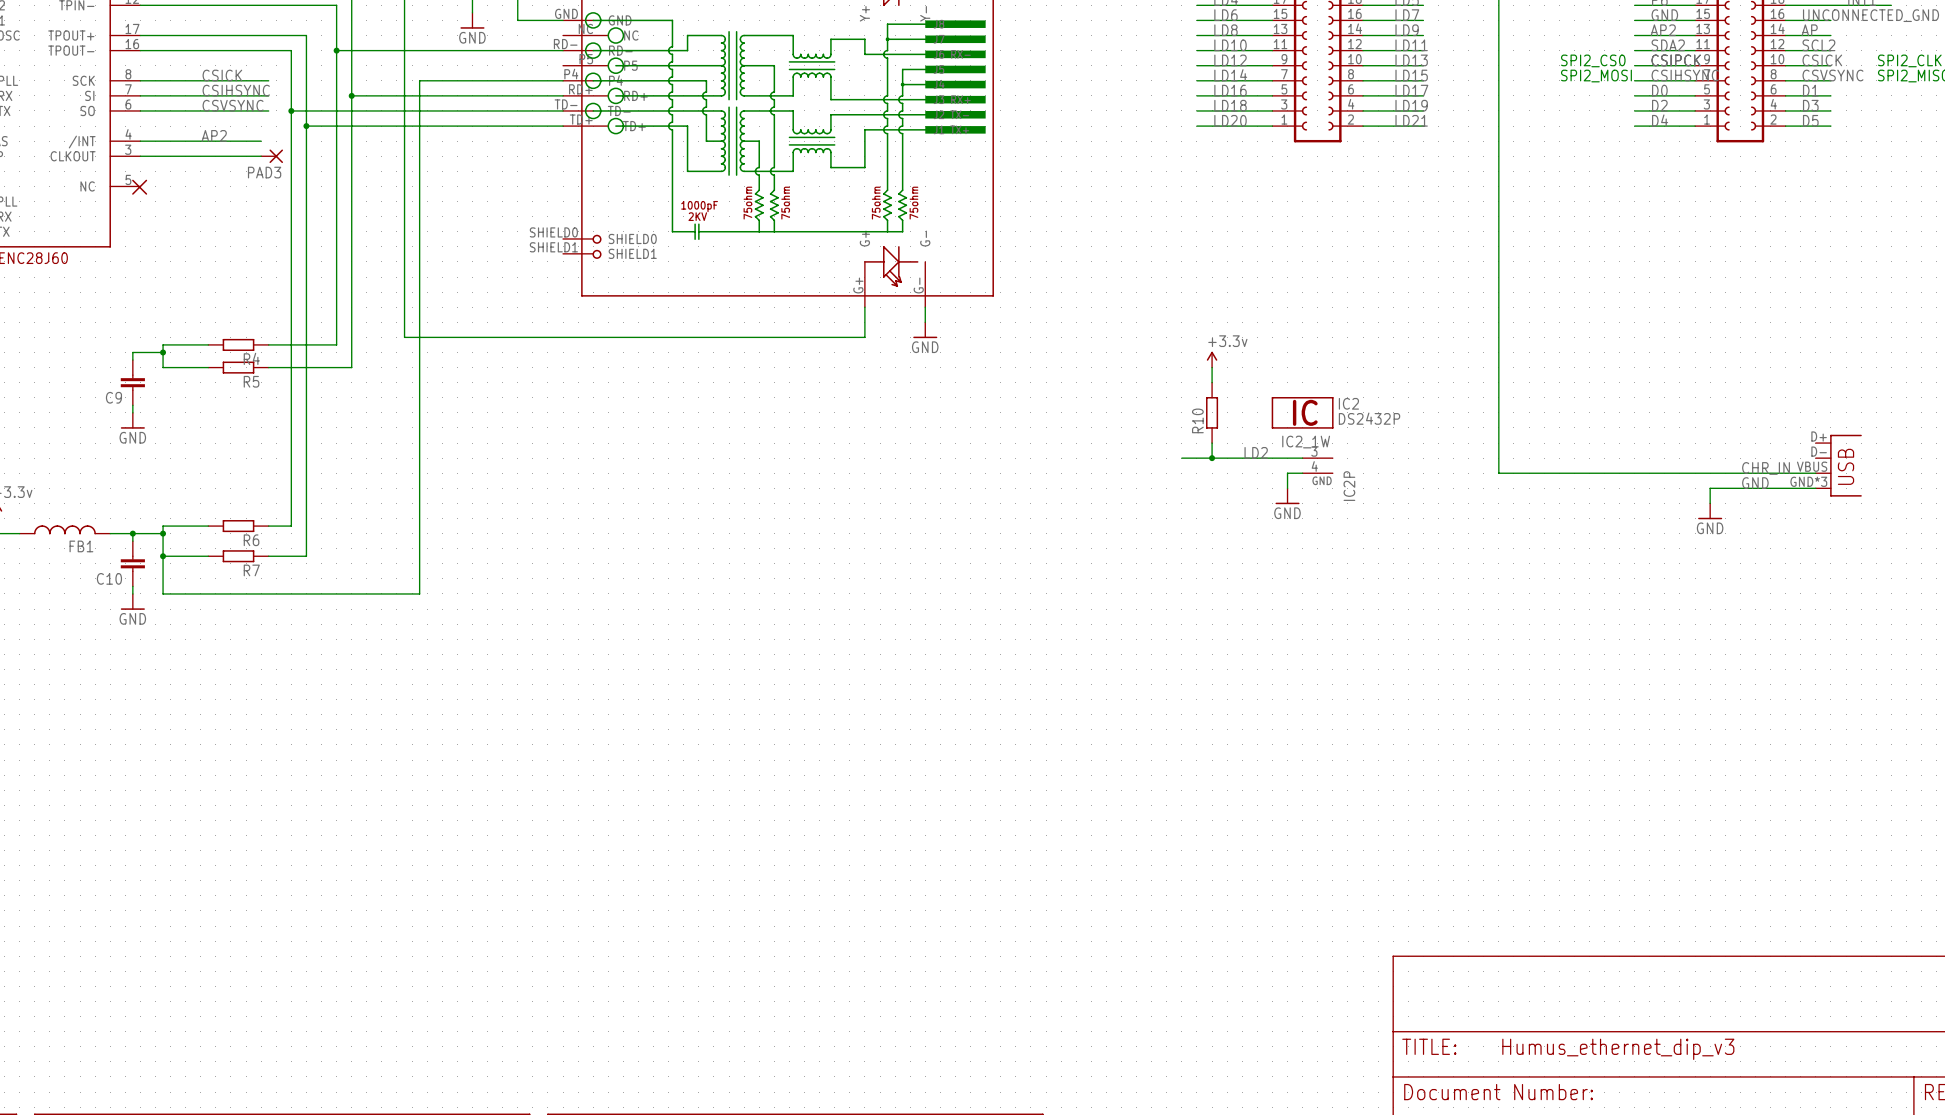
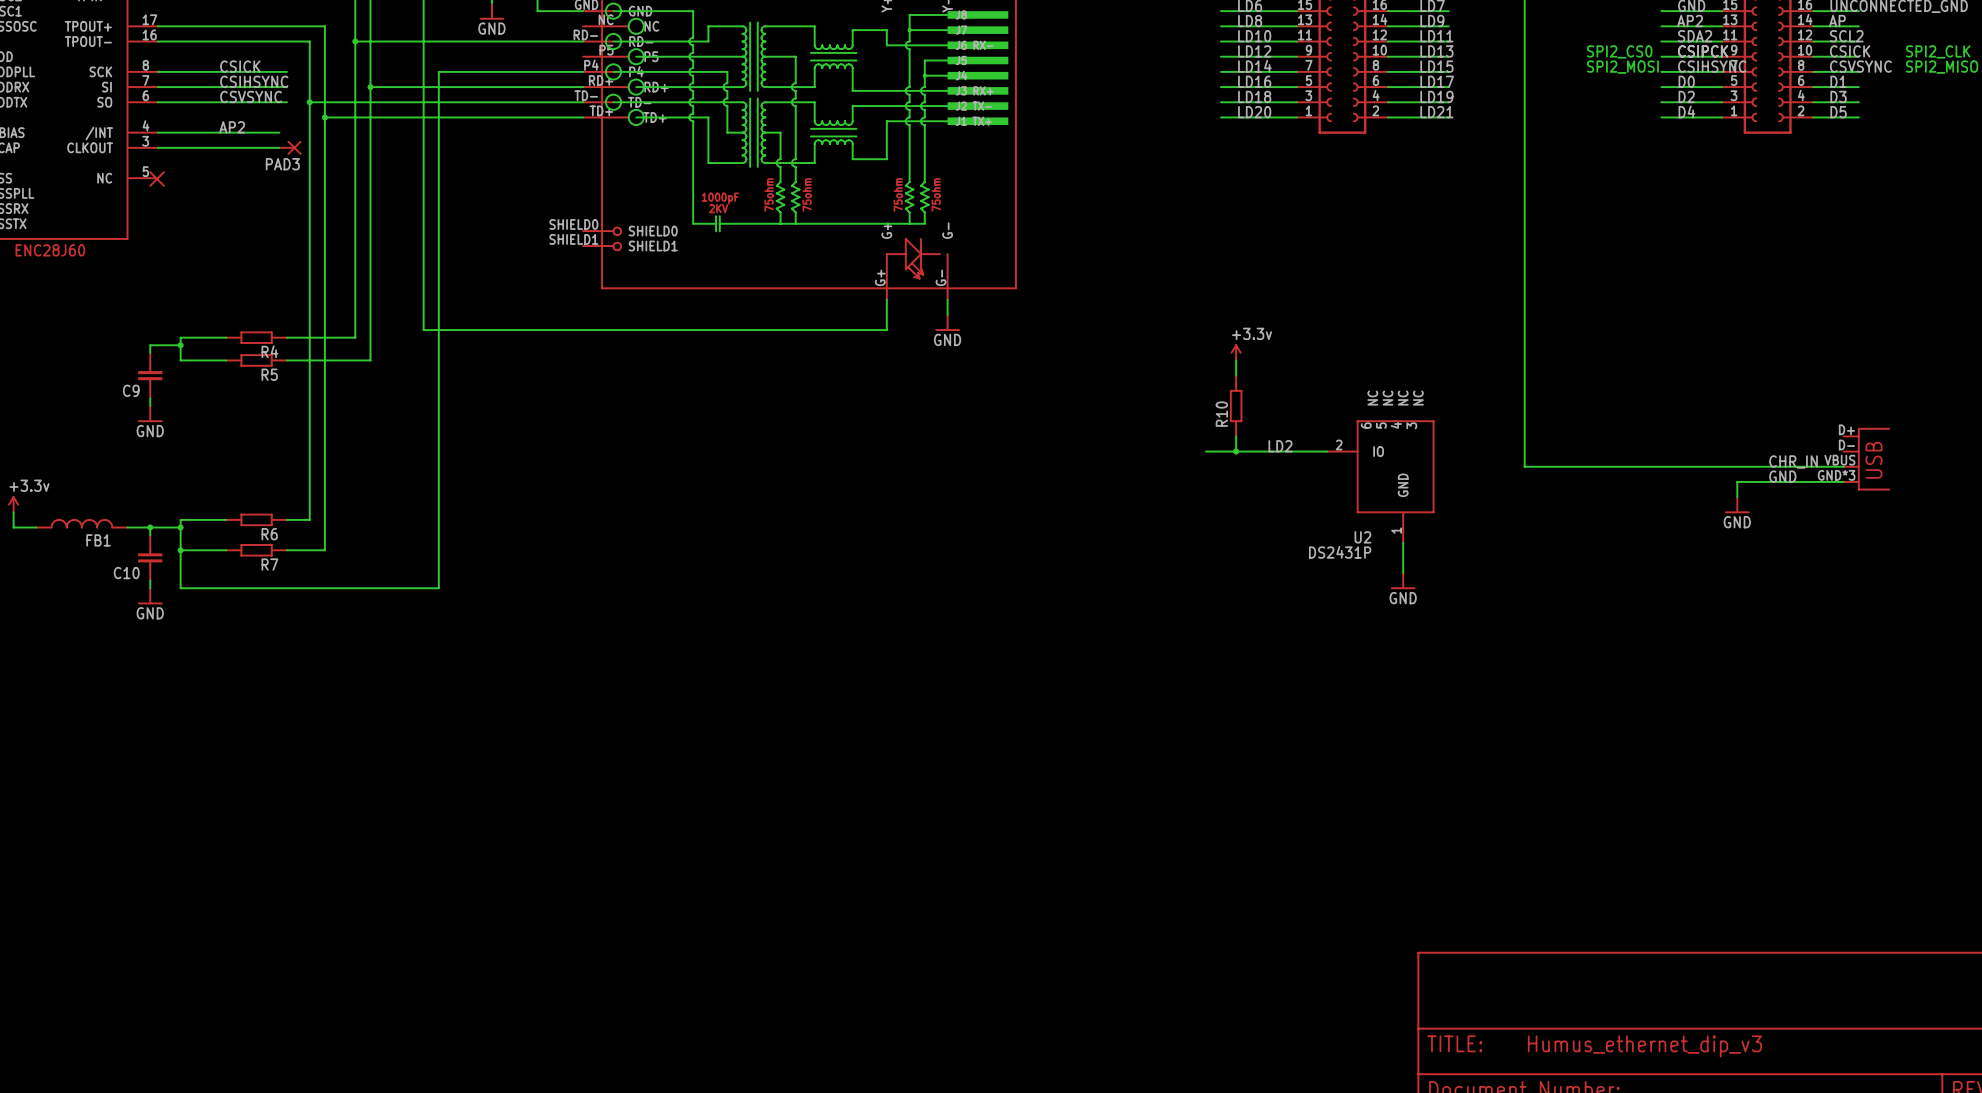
IC2: DS2432P (1302, 412) -> none
IC2_1W: (1317, 458) -> none
wire: (1302, 473) (1287, 473) (1287, 488) -> none
IC2P: (1317, 473) -> none
U2: none -> DS2431P (1380, 481)
power symbol position: GND (1287, 496) -> GND (1403, 581)
wire: none -> (1403, 542) (1403, 573)

